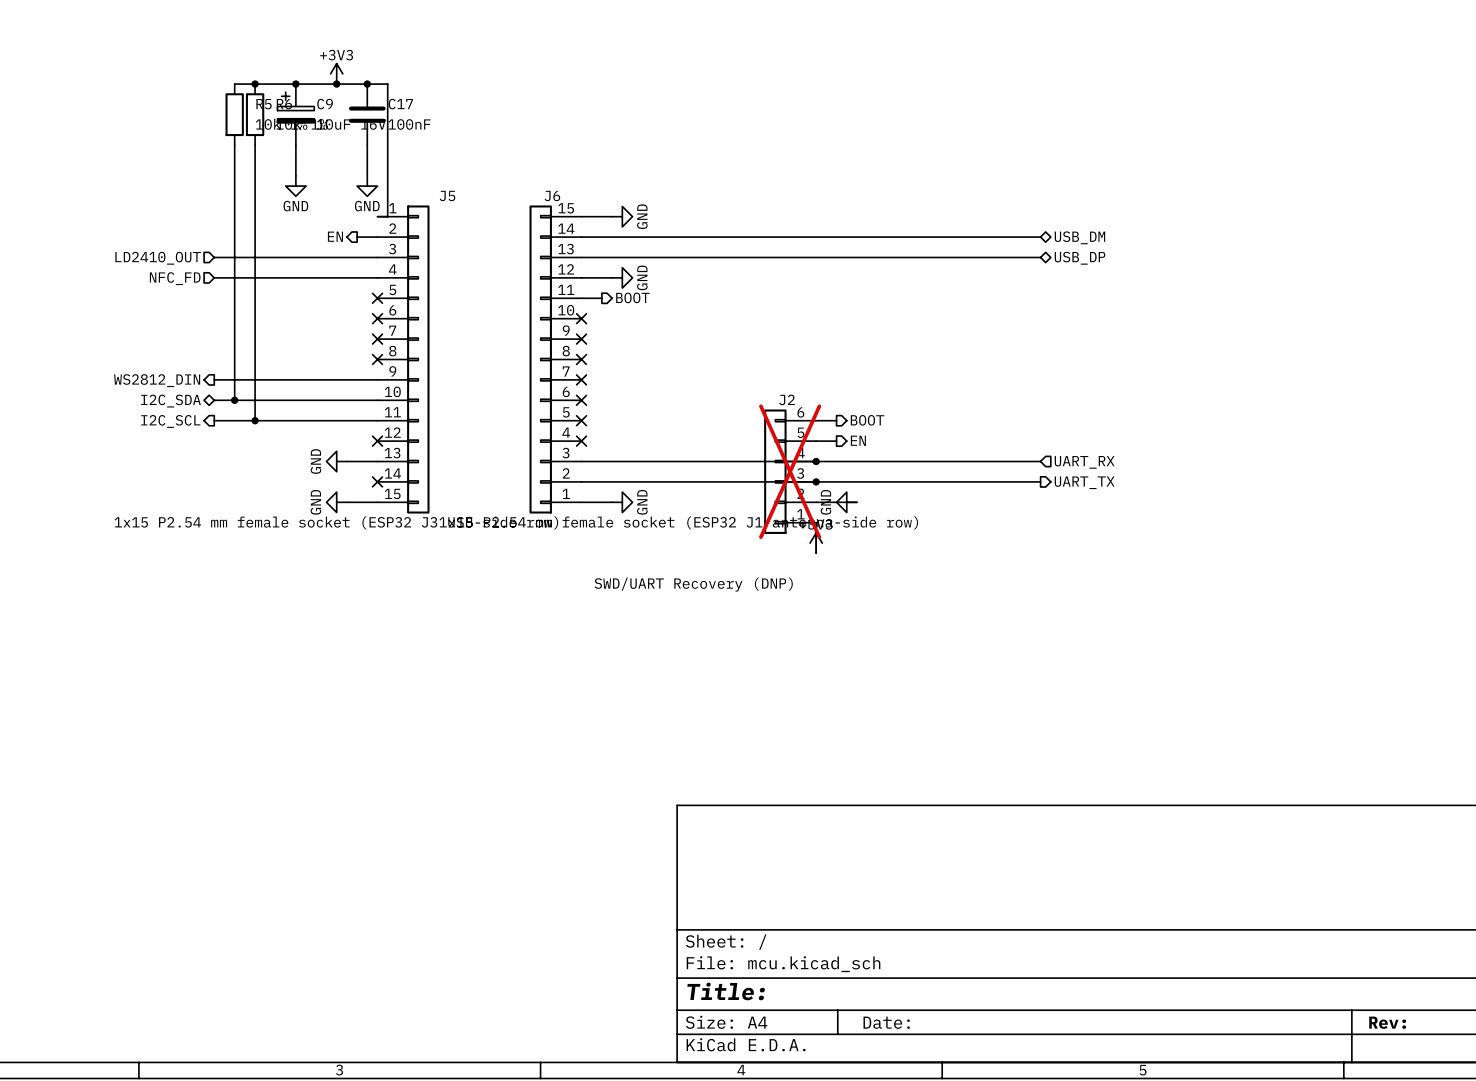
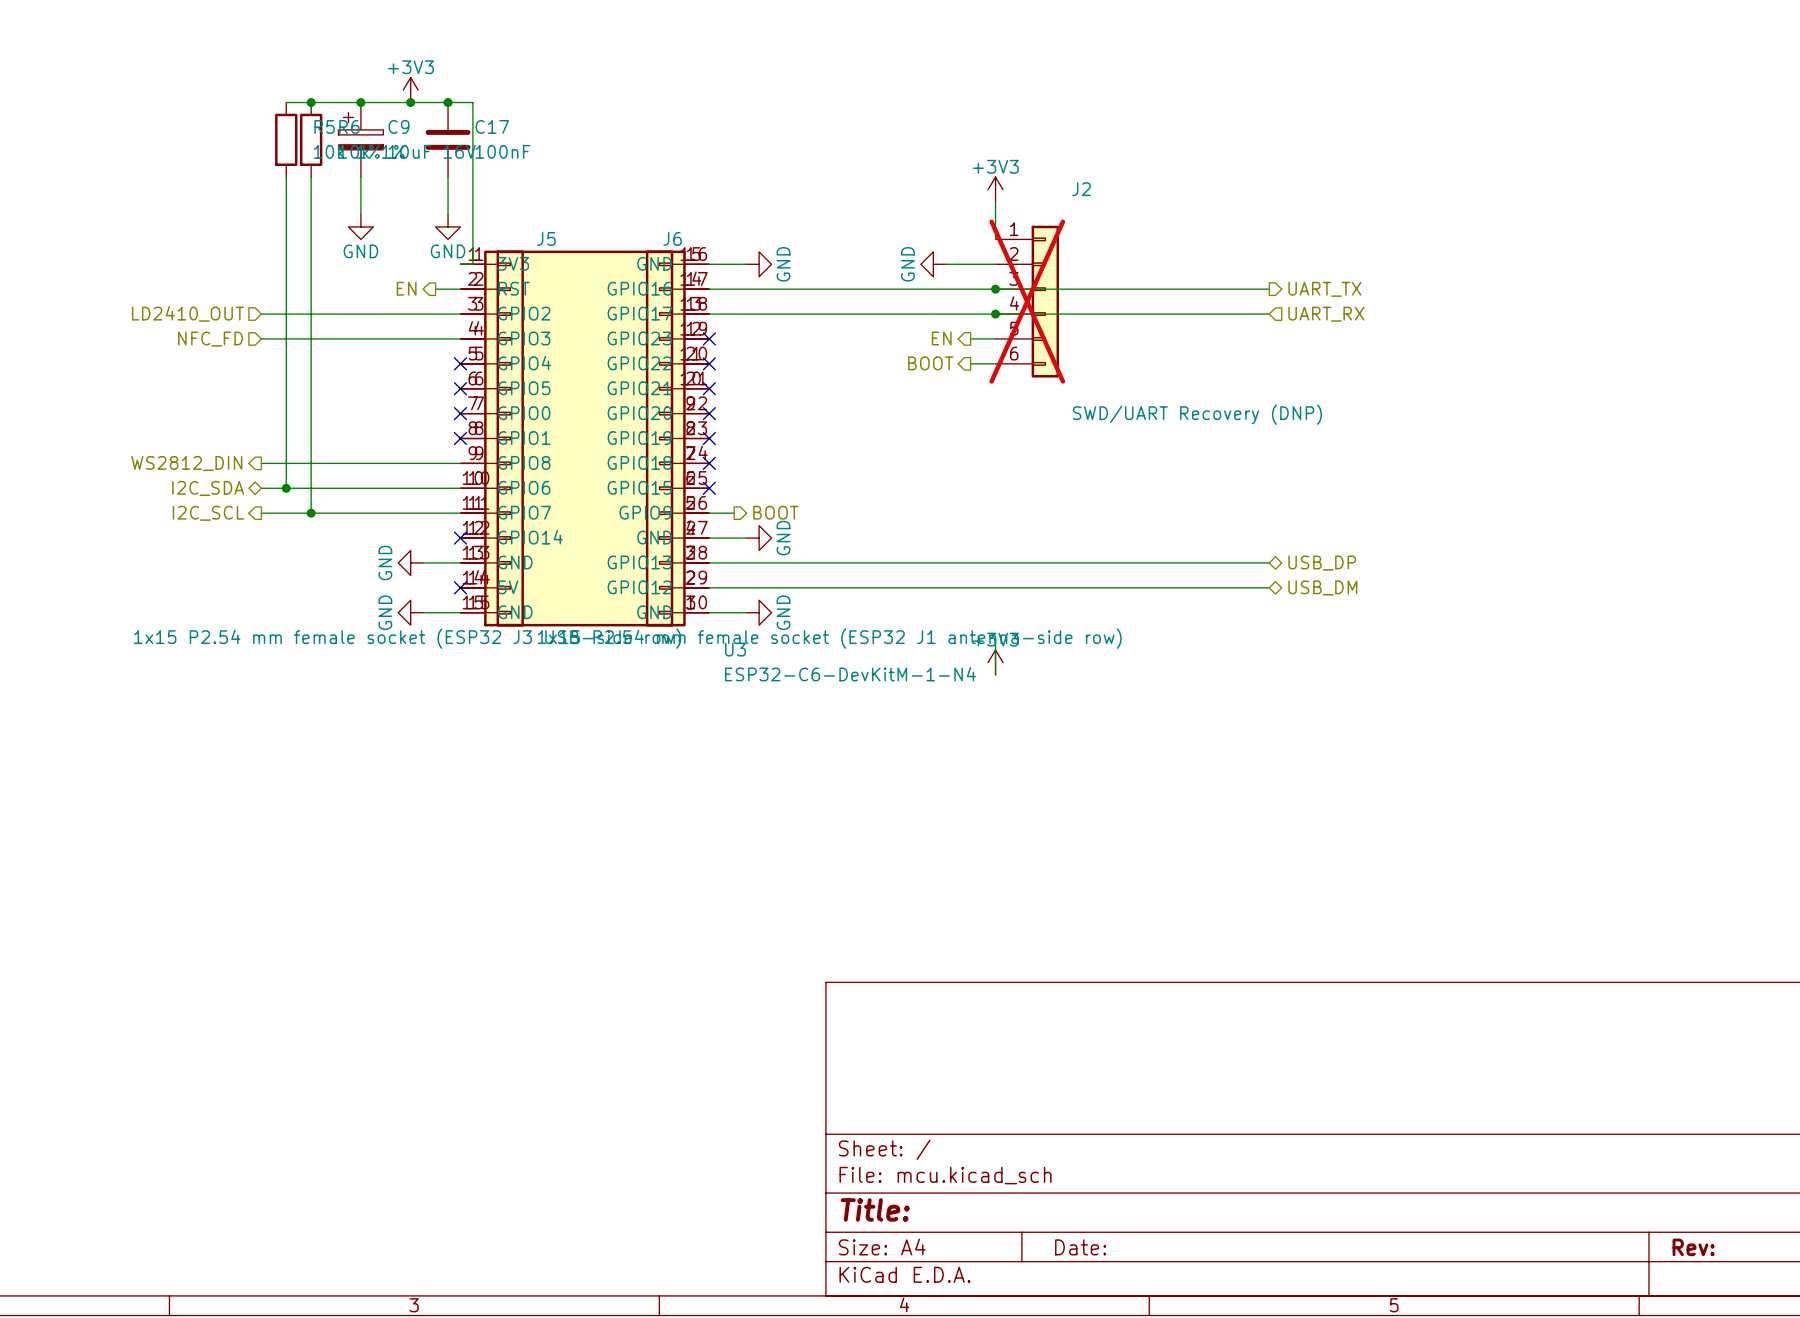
power symbol: none -> +3V3 (995, 189)
wire: none -> (995, 202) (995, 239)
power symbol: none -> GND (933, 264)
wire: none -> (945, 264) (995, 264)
junction: none -> (995, 289)
hierarchical label shape: bidirectional (1079, 237) -> output (1324, 289)
hierarchical label: USB_DM (1079, 237) -> UART_TX (1324, 289)
junction: none -> (995, 314)
hierarchical label shape: bidirectional (1080, 258) -> input (1326, 314)
hierarchical label: USB_DP (1080, 258) -> UART_RX (1326, 314)
wire: (581, 277) (612, 277) -> (709, 538) (746, 538)
no-connect mark: none -> (709, 338)
power symbol: GND (622, 277) -> none
hierarchical label: BOOT (632, 297) -> none
hierarchical label: none -> BOOT (930, 363)
wire: (581, 298) (601, 298) -> (709, 513) (734, 513)
no-connect mark: none -> (709, 363)
U3: none -> ESP32-C6-DevKitM-1-N4 (584, 438)
J2 name position: J2 (787, 399) -> J2 (1081, 189)
no-connect mark: (581, 420) -> none
hierarchical label: none -> BOOT (775, 512)
wire: (816, 420) (836, 420) -> (970, 338) (995, 338)
hierarchical label: BOOT (867, 420) -> none
hierarchical label rotation: 0° (858, 440) -> 180° (941, 338)
hierarchical label position: EN (858, 440) -> EN (941, 338)
no-connect mark: (581, 441) -> none
power symbol: none -> GND (759, 538)
wire: (816, 441) (836, 441) -> (970, 363) (995, 363)
junction: (816, 461) -> none
hierarchical label shape: input (1084, 462) -> bidirectional (1322, 563)
hierarchical label: UART_RX (1084, 462) -> USB_DP (1322, 563)
J2 rotation: 0° (775, 471) -> 180° (1045, 301)
J2 position: (790, 471) -> (1027, 301)
junction: (816, 481) -> none
hierarchical label shape: output (1084, 482) -> bidirectional (1322, 587)
hierarchical label: UART_TX (1084, 482) -> USB_DM (1322, 587)
wire: (816, 502) (856, 502) -> none
power symbol: GND (846, 502) -> none
J2 value position: SWD/UART Recovery (DNP) (693, 584) -> SWD/UART Recovery (DNP) (1197, 414)

